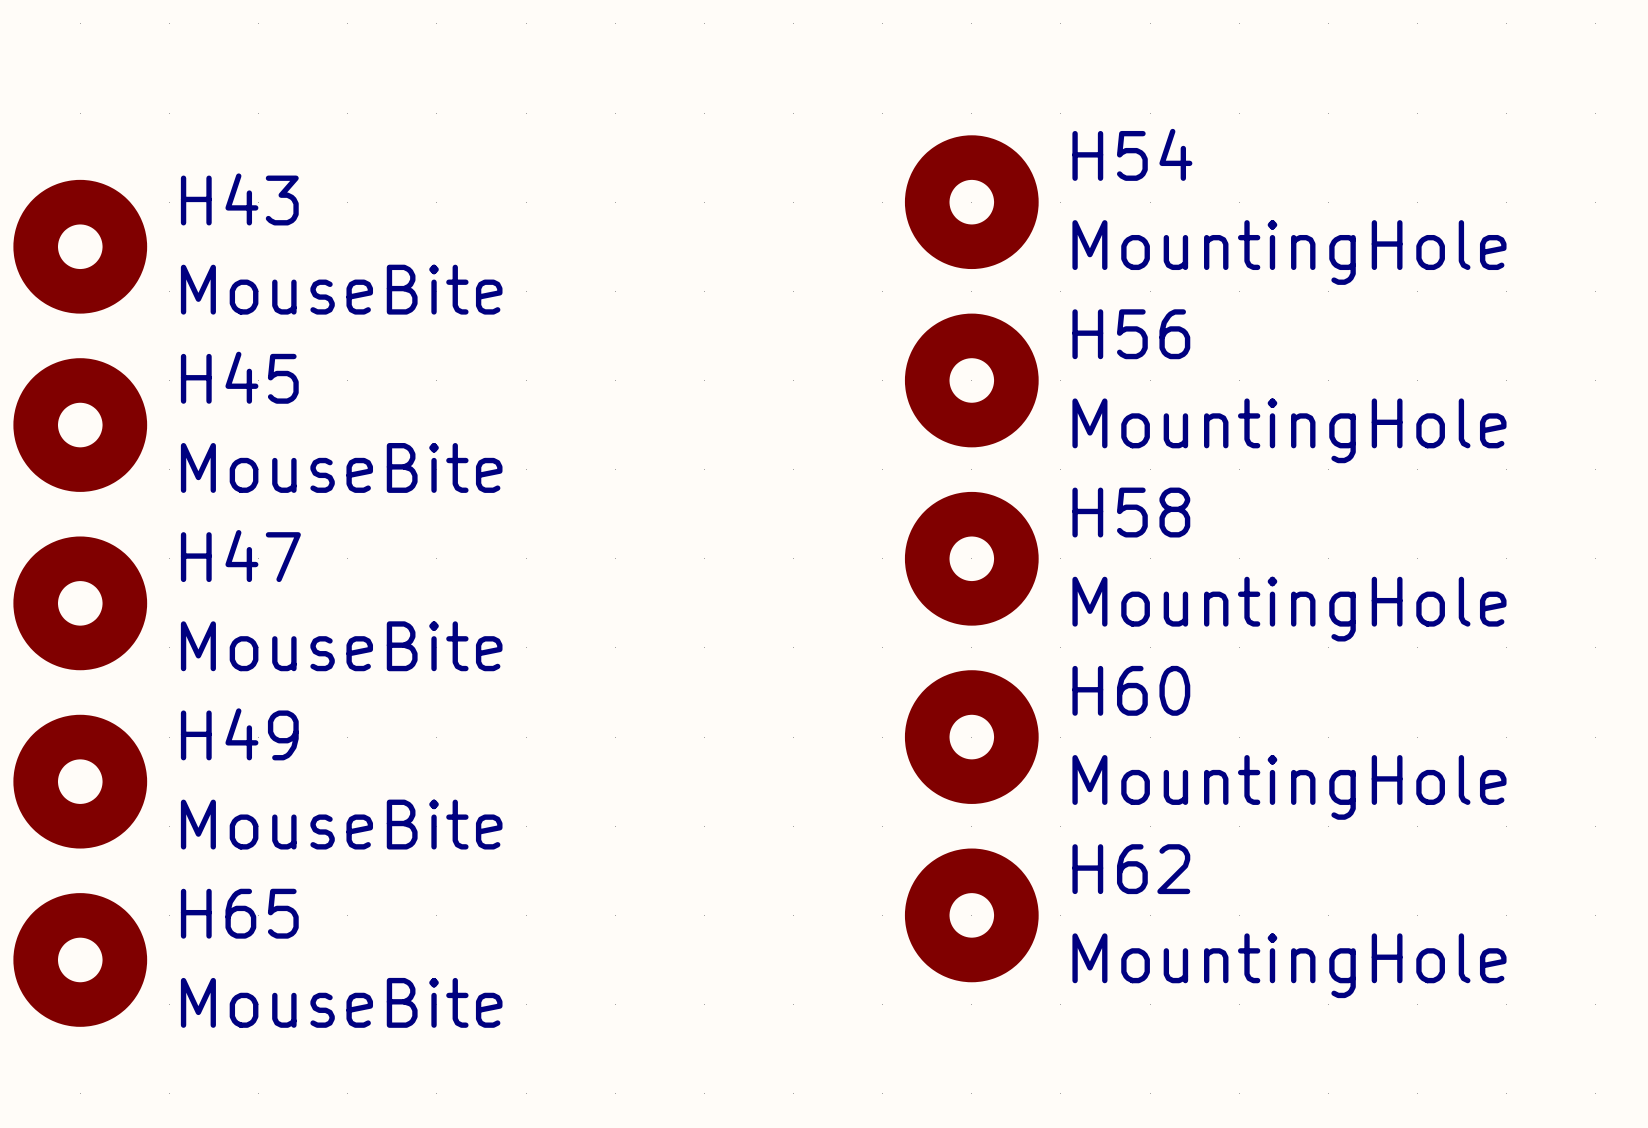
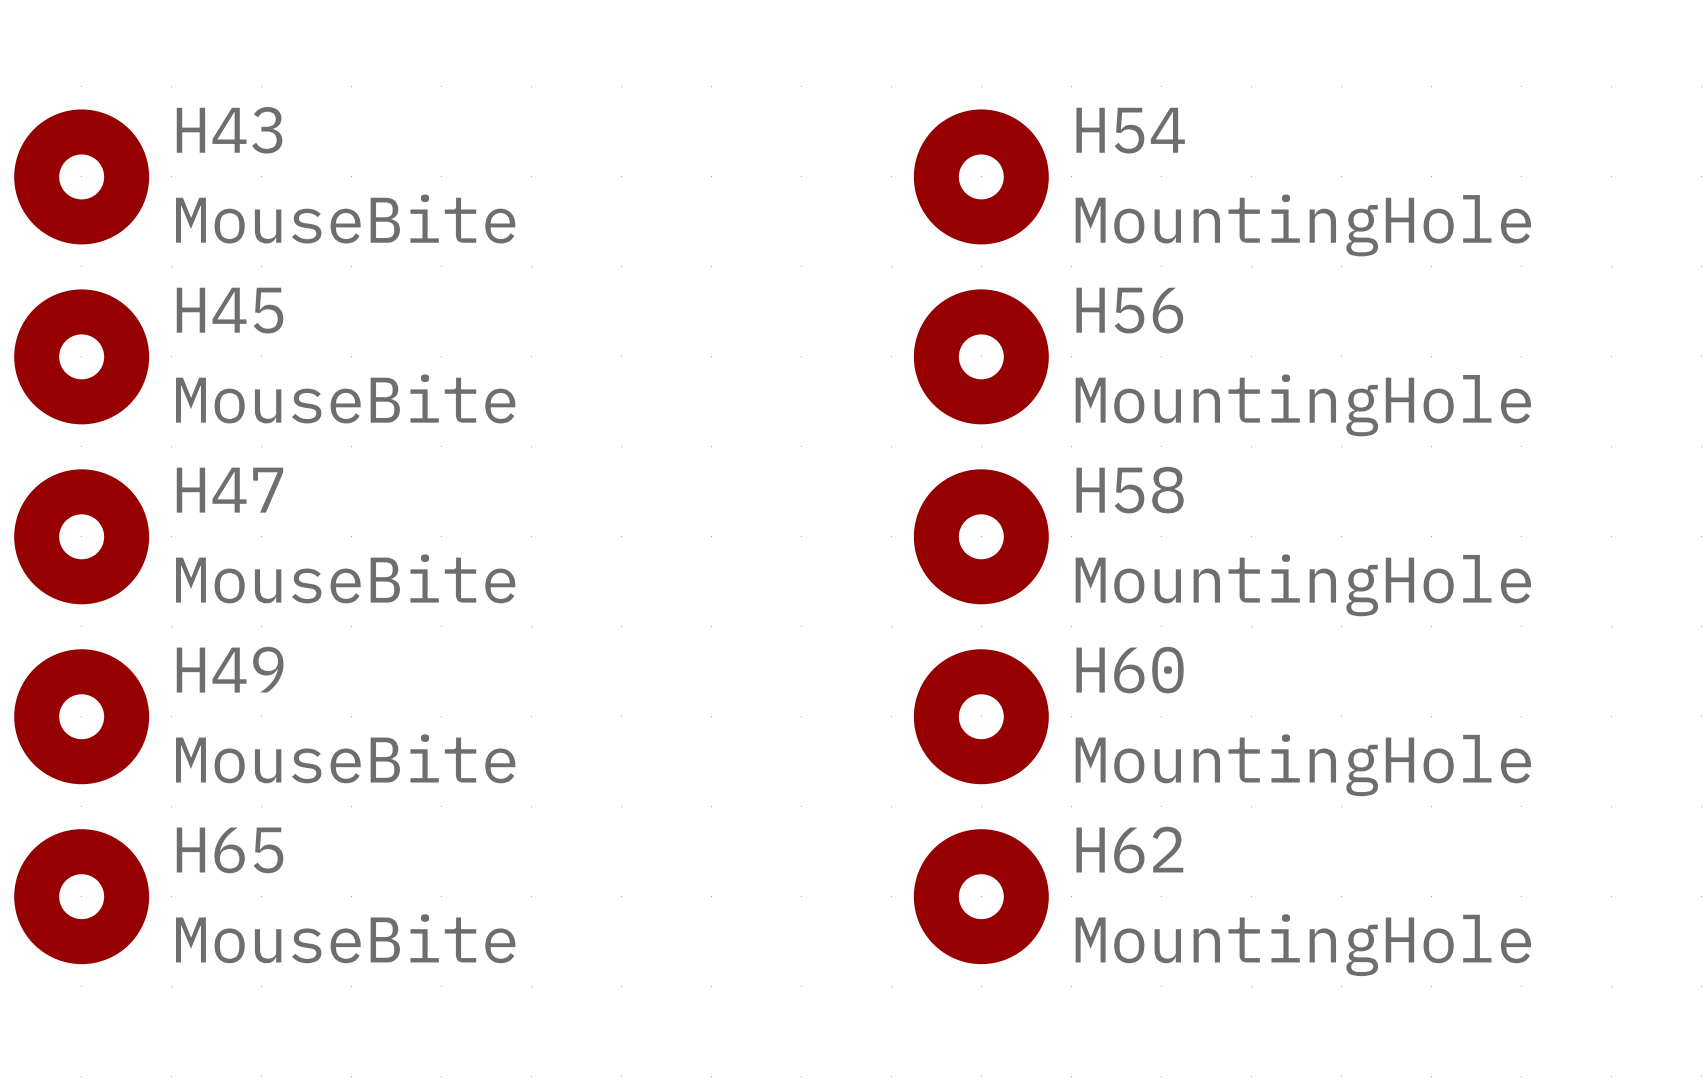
H43 position: (80, 246) -> (81, 176)
H45 position: (80, 425) -> (81, 356)
H47 position: (80, 603) -> (81, 536)
H49 position: (80, 781) -> (81, 716)
H65 position: (80, 959) -> (81, 896)

